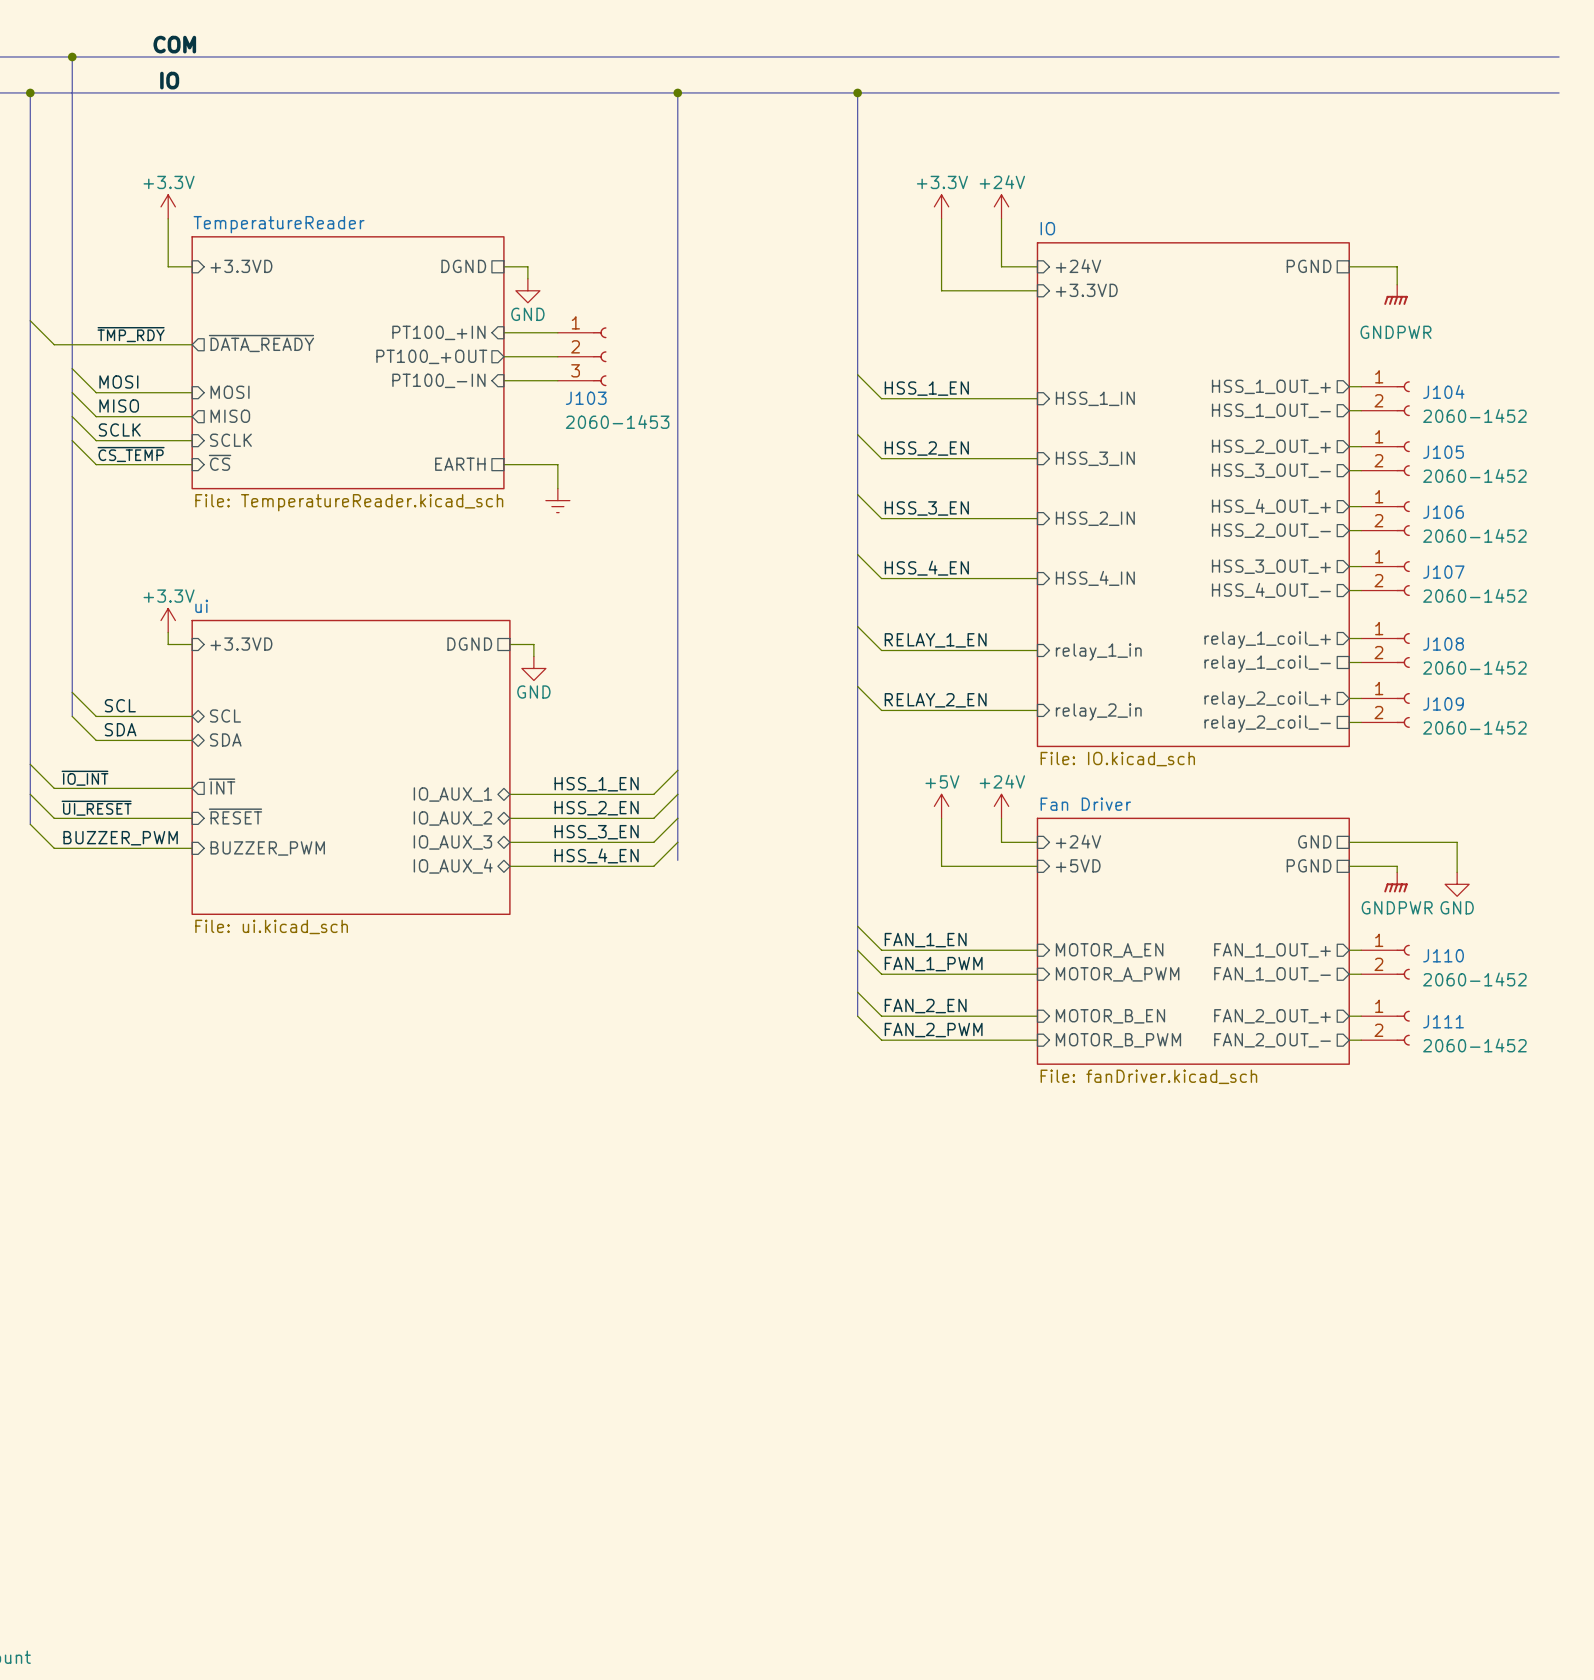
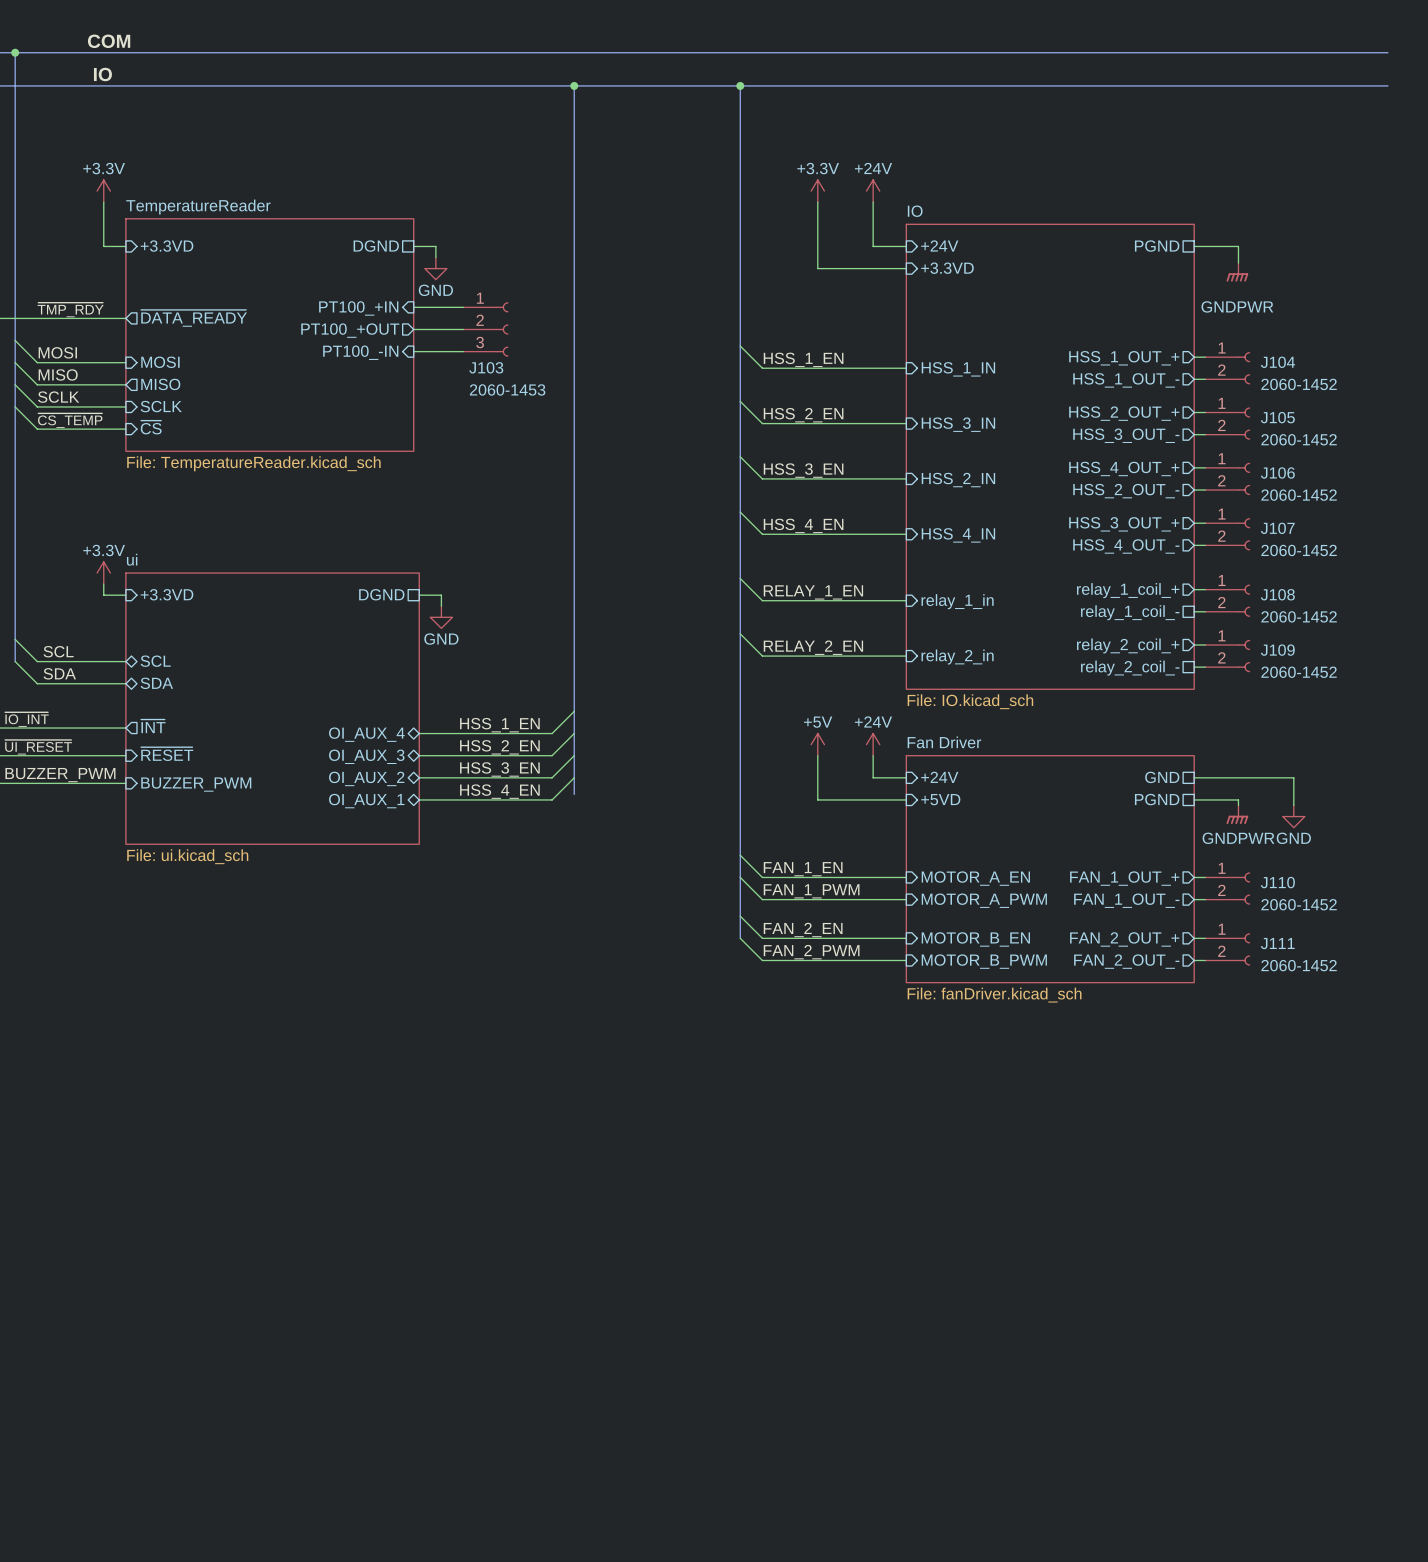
sheet pin: EARTH (460, 464) -> none
wire: (503, 464) (557, 464) (557, 488) -> none
power symbol: (557, 500) -> none
sheet pin: IO_AUX_1 (452, 794) -> OI_AUX_4 (366, 734)
sheet pin: IO_AUX_2 (452, 818) -> OI_AUX_3 (366, 756)
sheet pin: IO_AUX_3 (452, 842) -> OI_AUX_2 (366, 778)
sheet pin: IO_AUX_4 (453, 866) -> OI_AUX_1 (366, 801)

